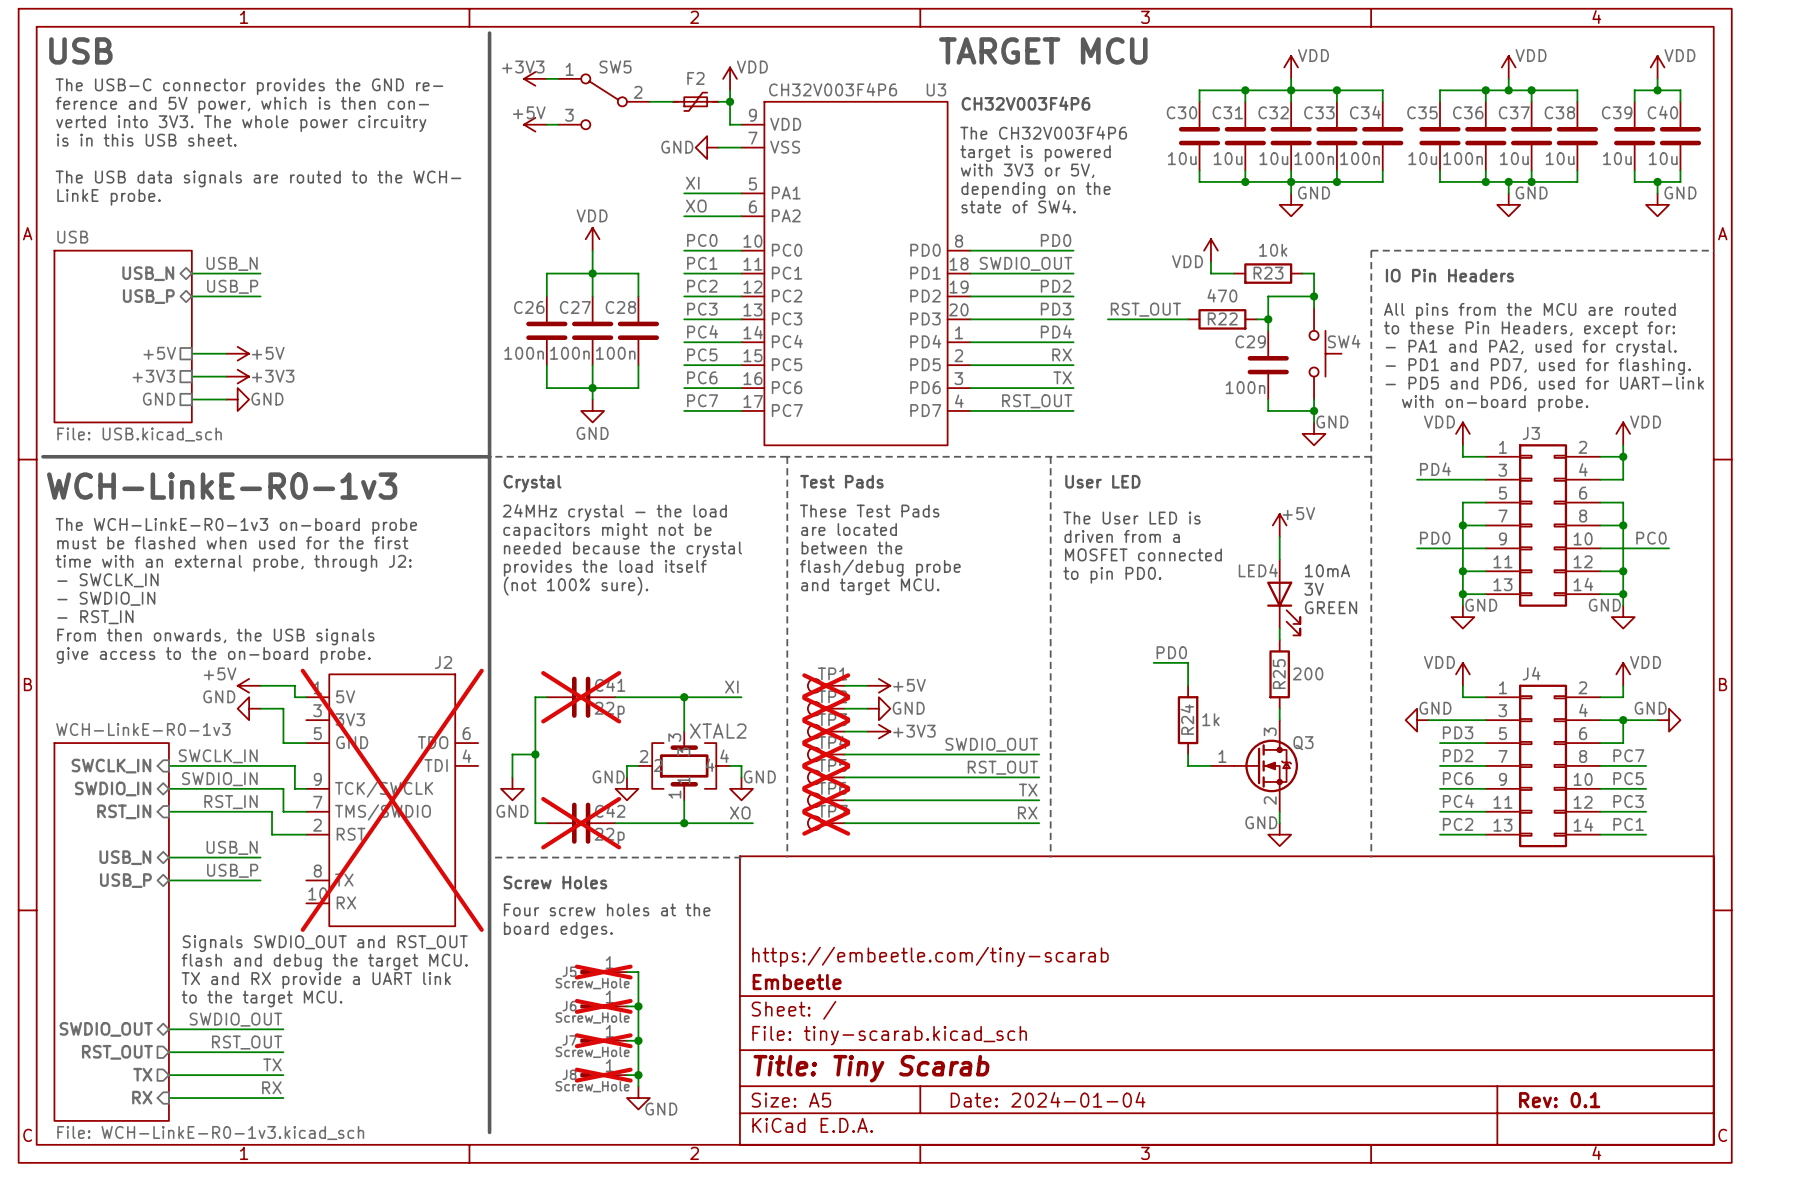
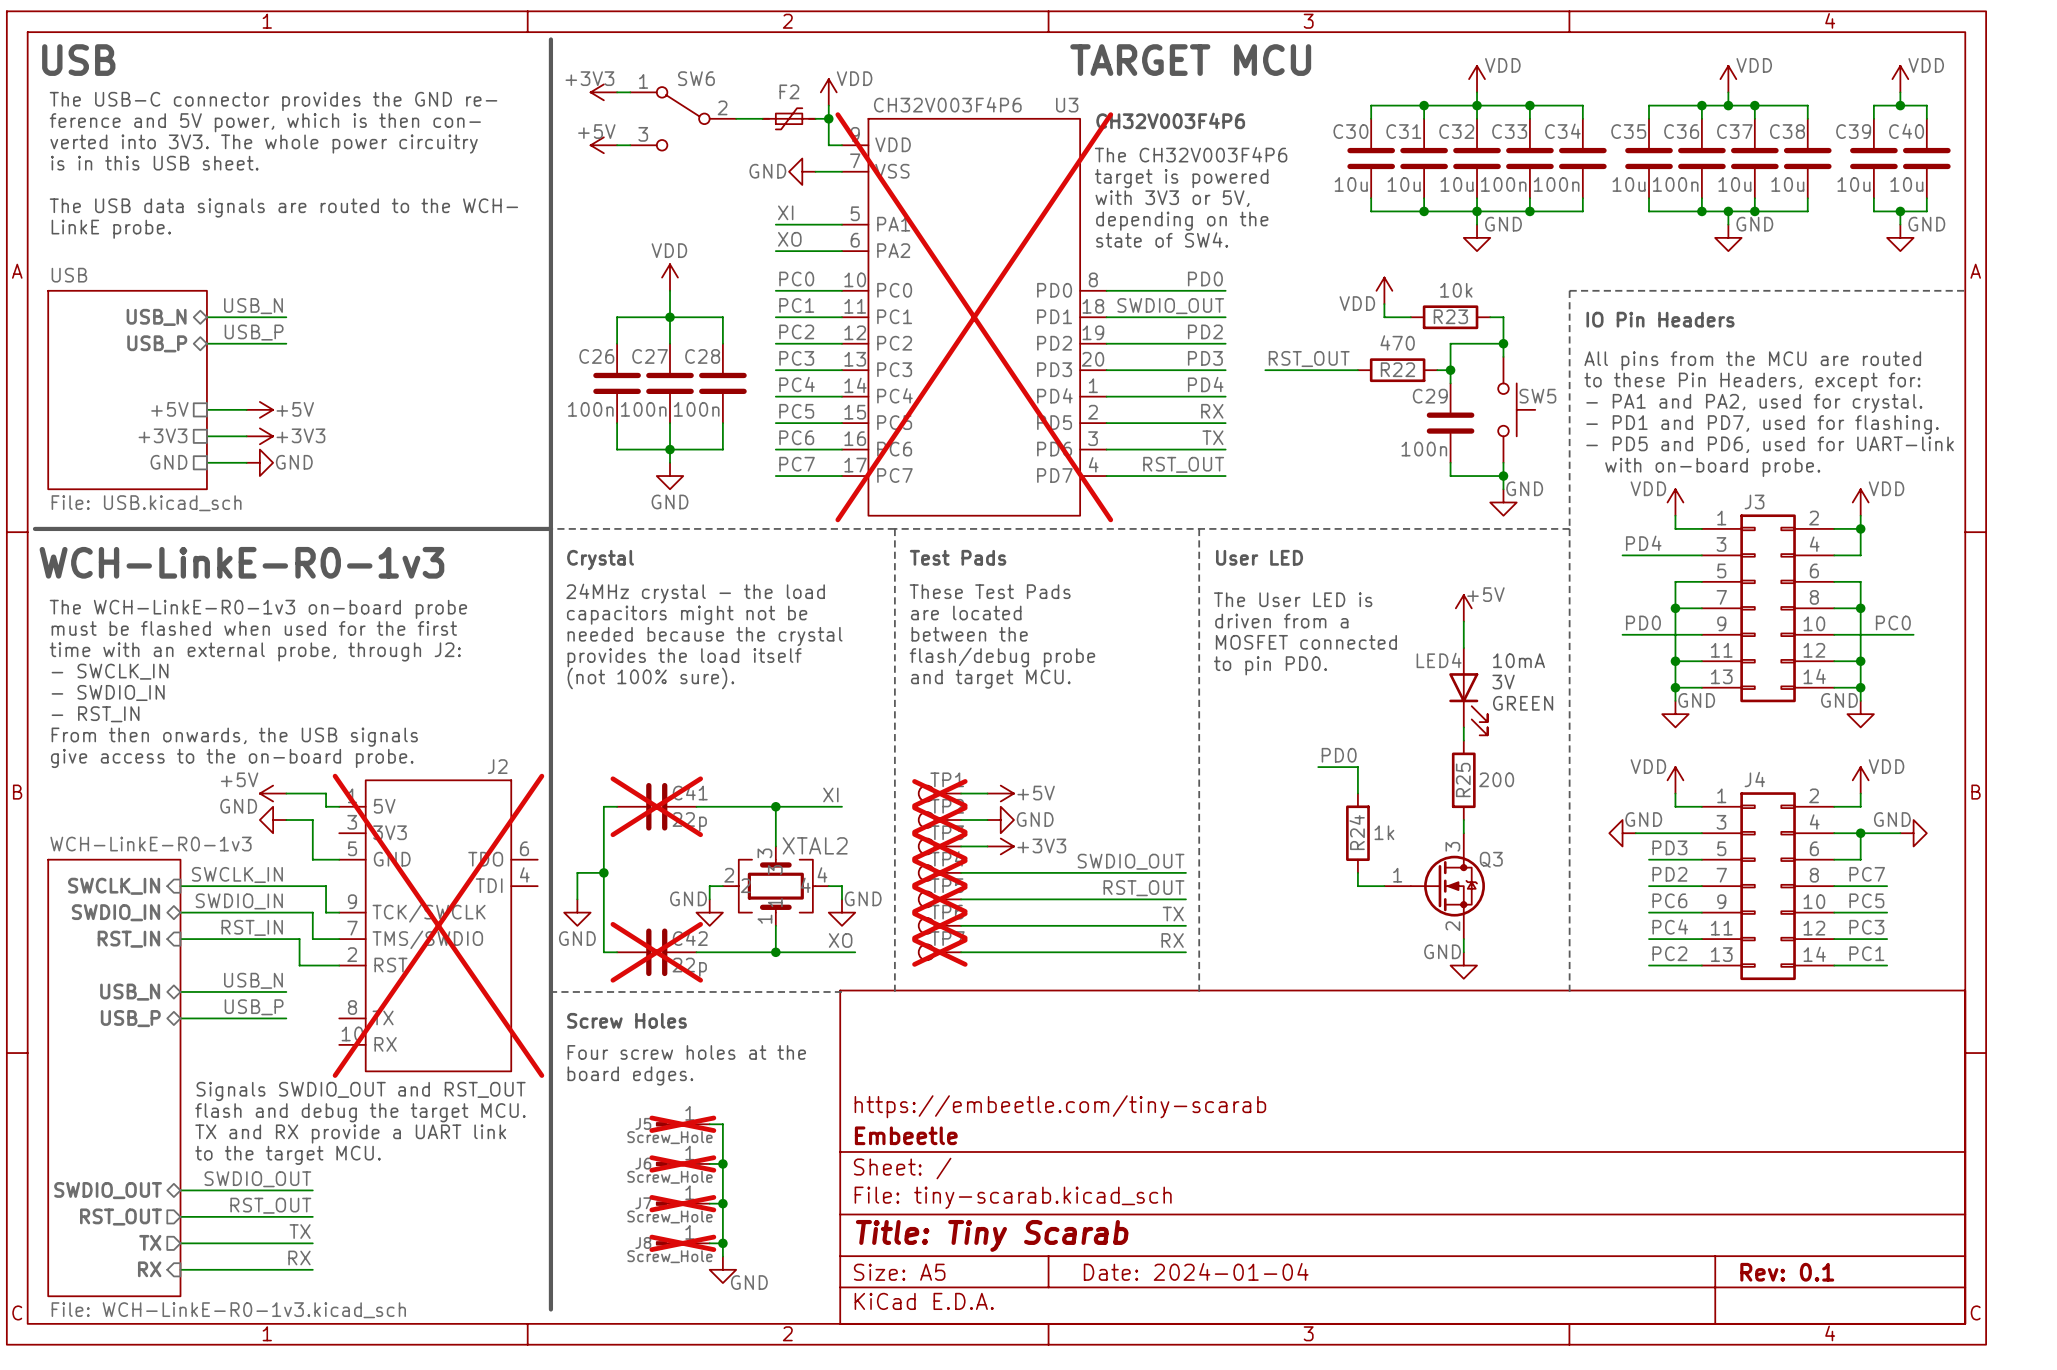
SW5 name: SW5 (615, 67) -> SW6 (696, 78)
U3 do-not-place cross: none -> (974, 317)
SW4 name: SW4 (1344, 341) -> SW5 (1537, 396)

